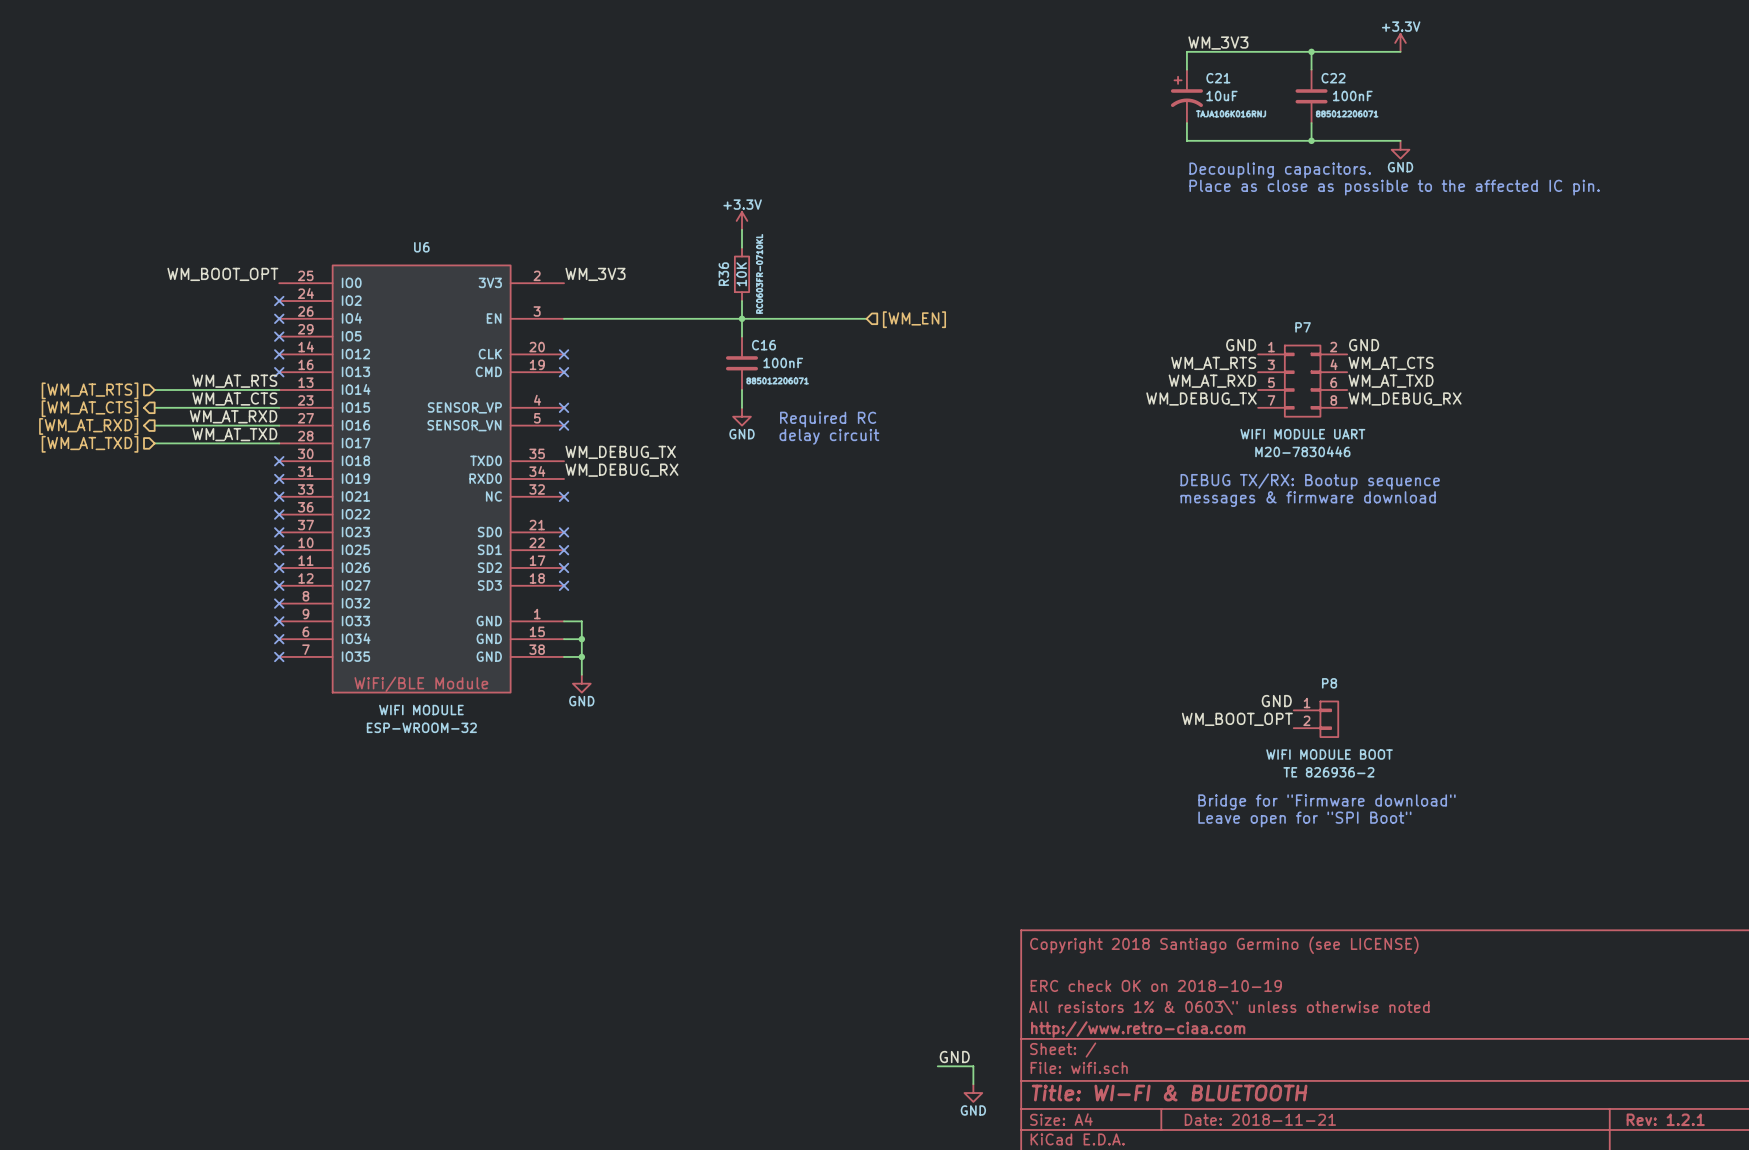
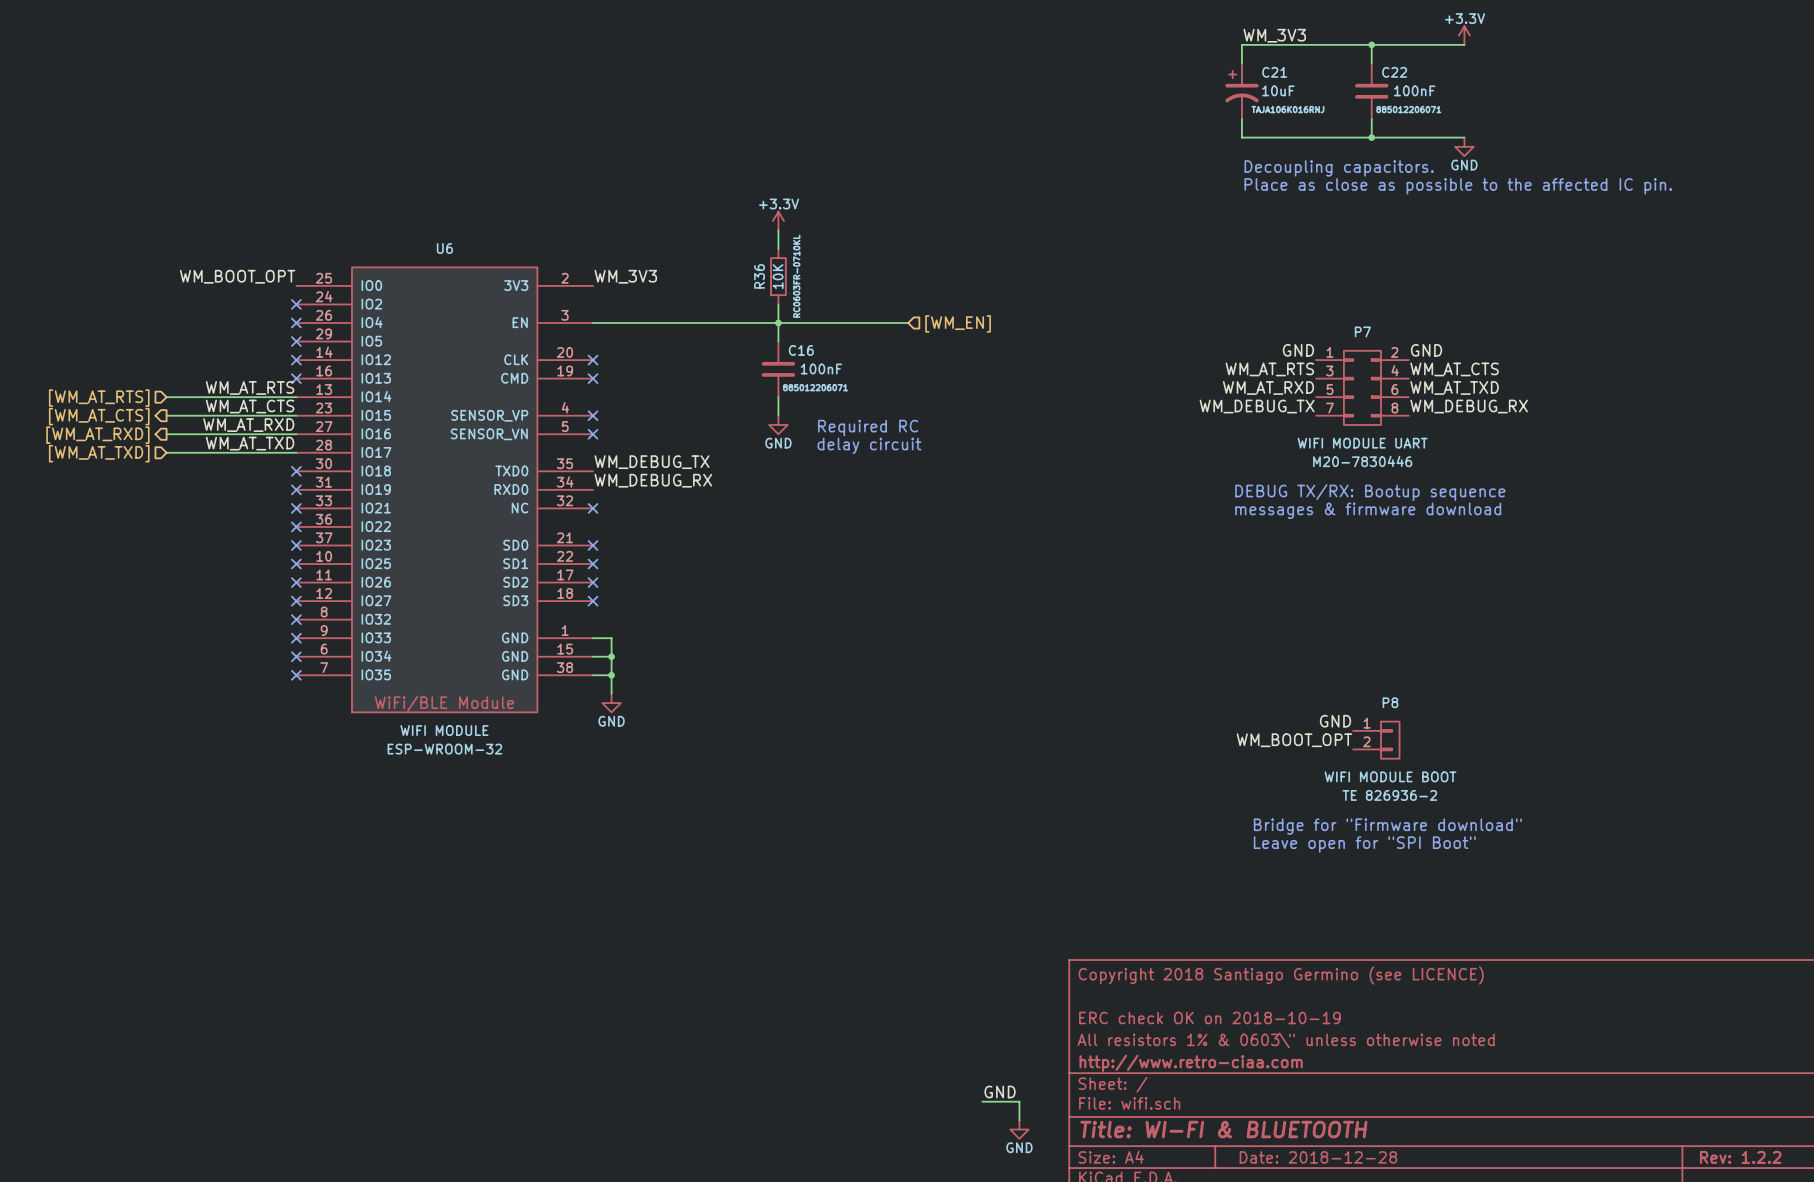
title block: Copyright 2018 Santiago Germino (see LICENSE) (1224, 945) -> Copyright 2018 Santiago Germino (see LICENCE) (1281, 975)
title block: Date: 2018-11-21 (1260, 1119) -> Date: 2018-12-28 (1318, 1157)
title block: Rev: 1.2.1 (1665, 1119) -> Rev: 1.2.2 (1740, 1157)

